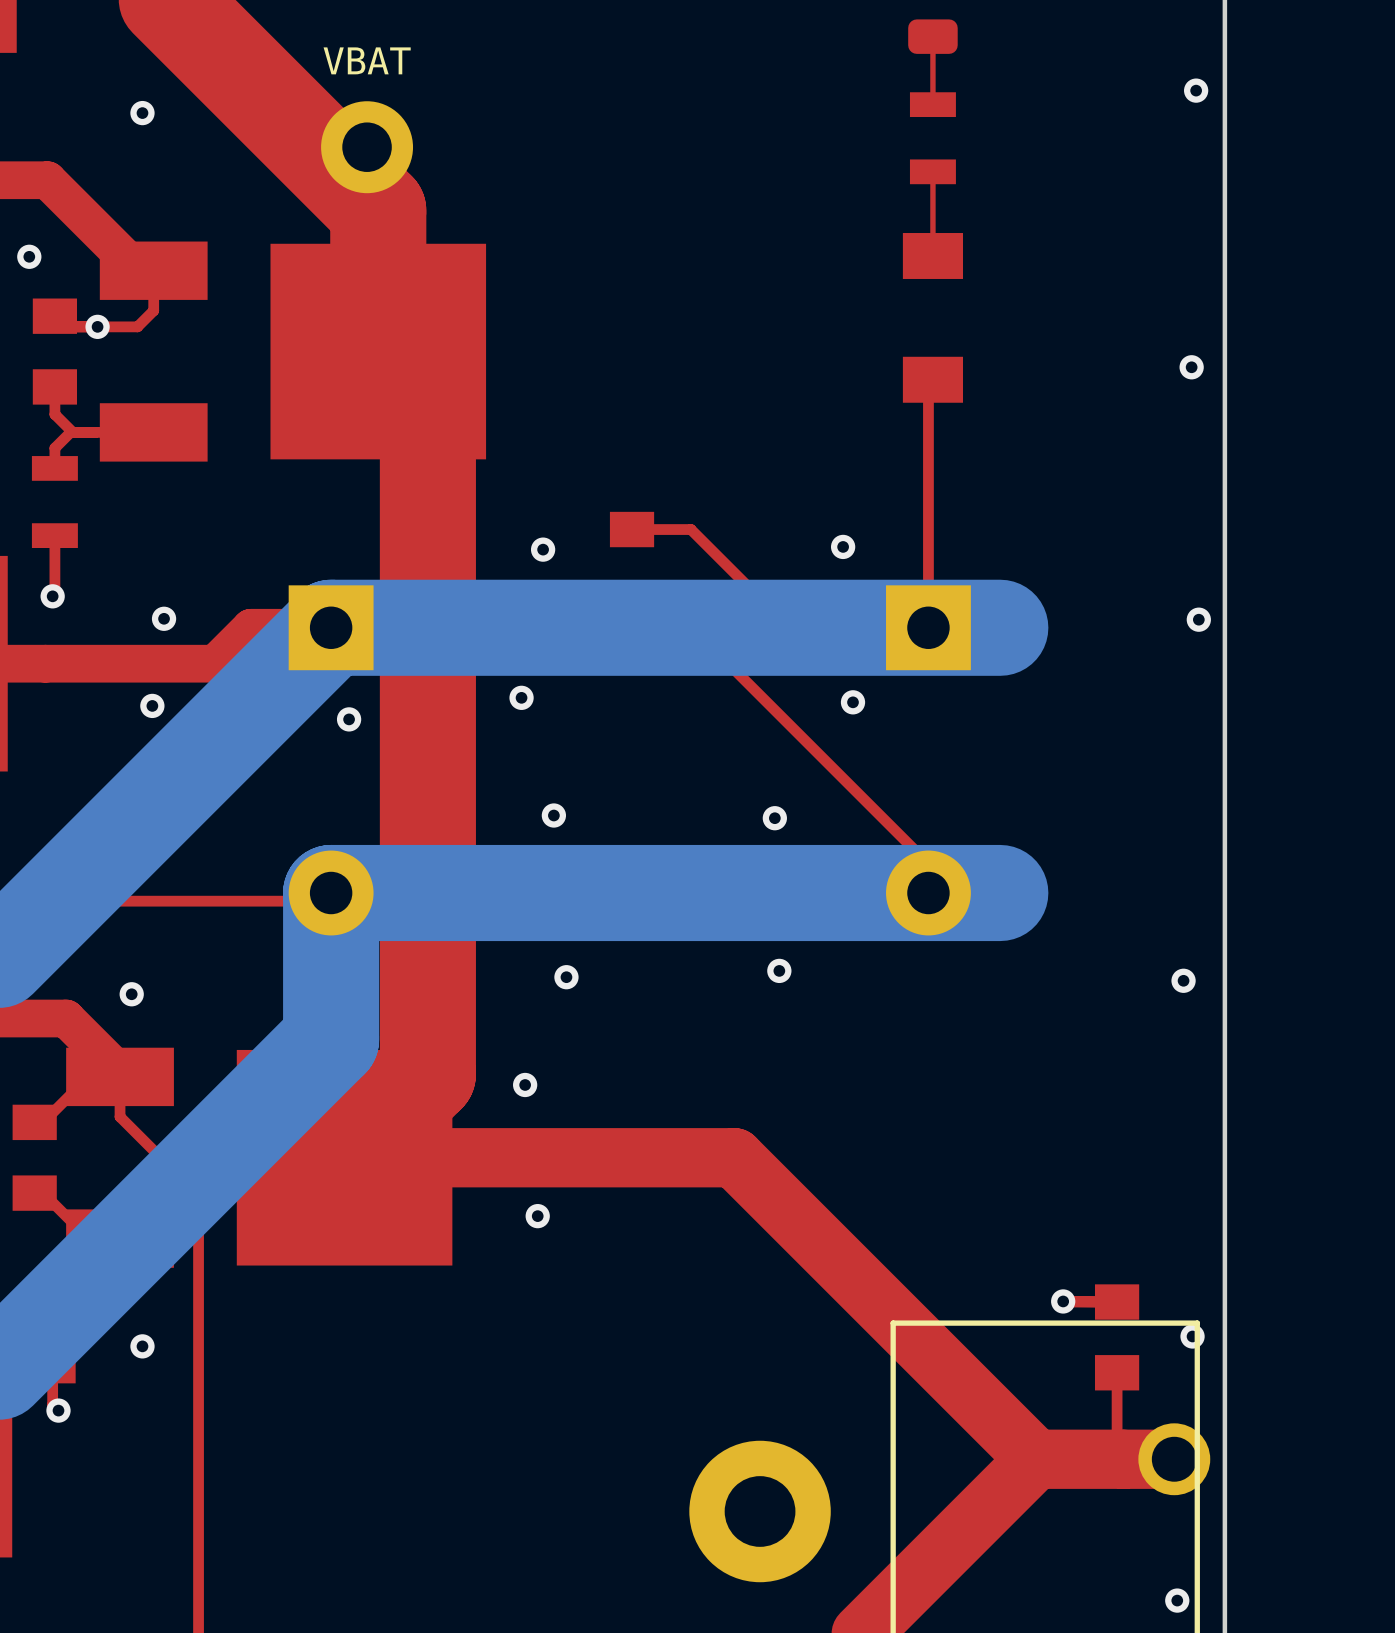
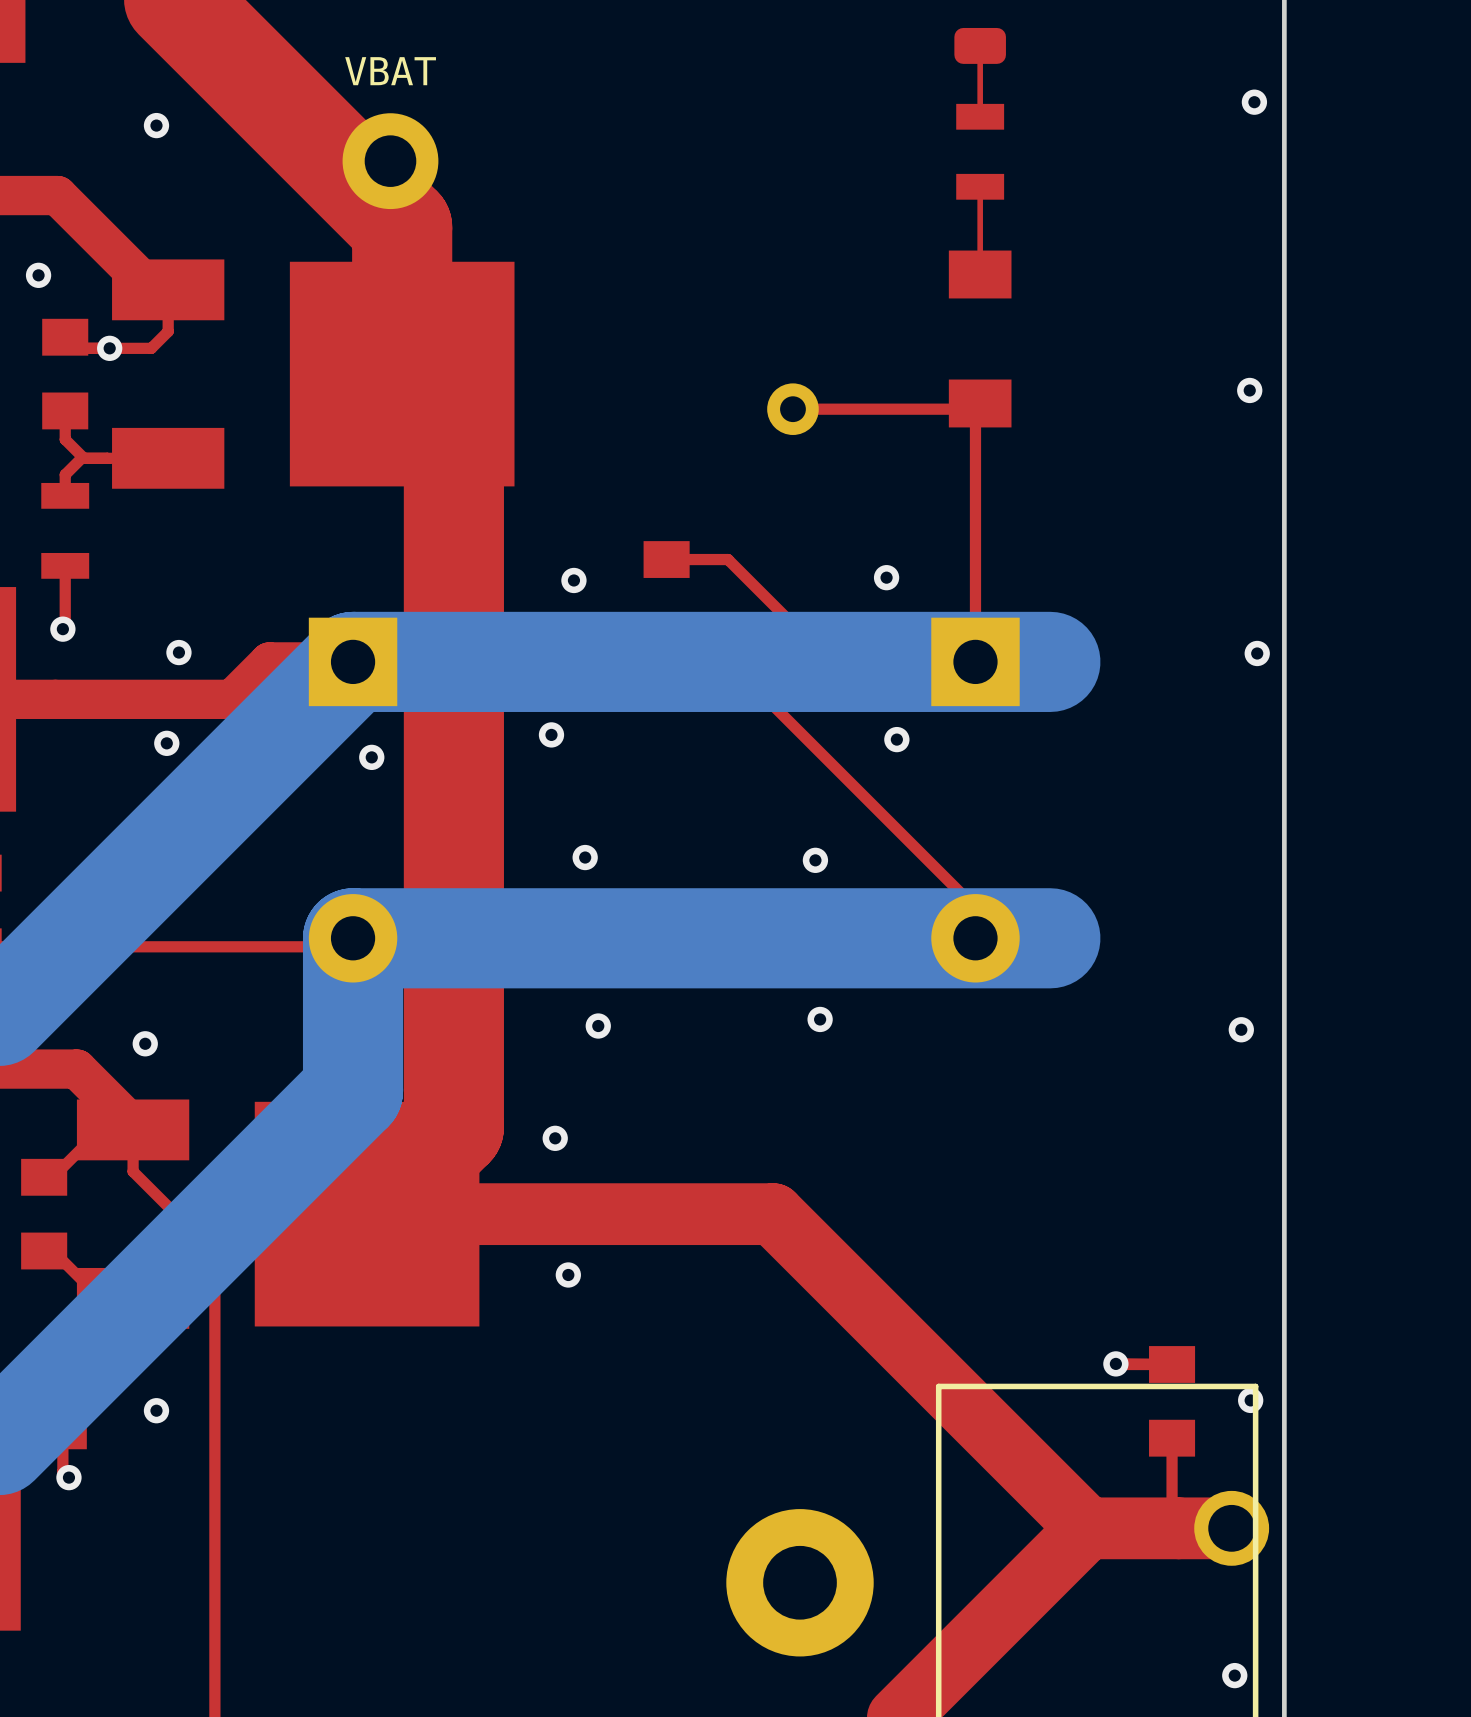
top track: none -> (975, 408) (792, 409)
part: none -> (792, 409)

